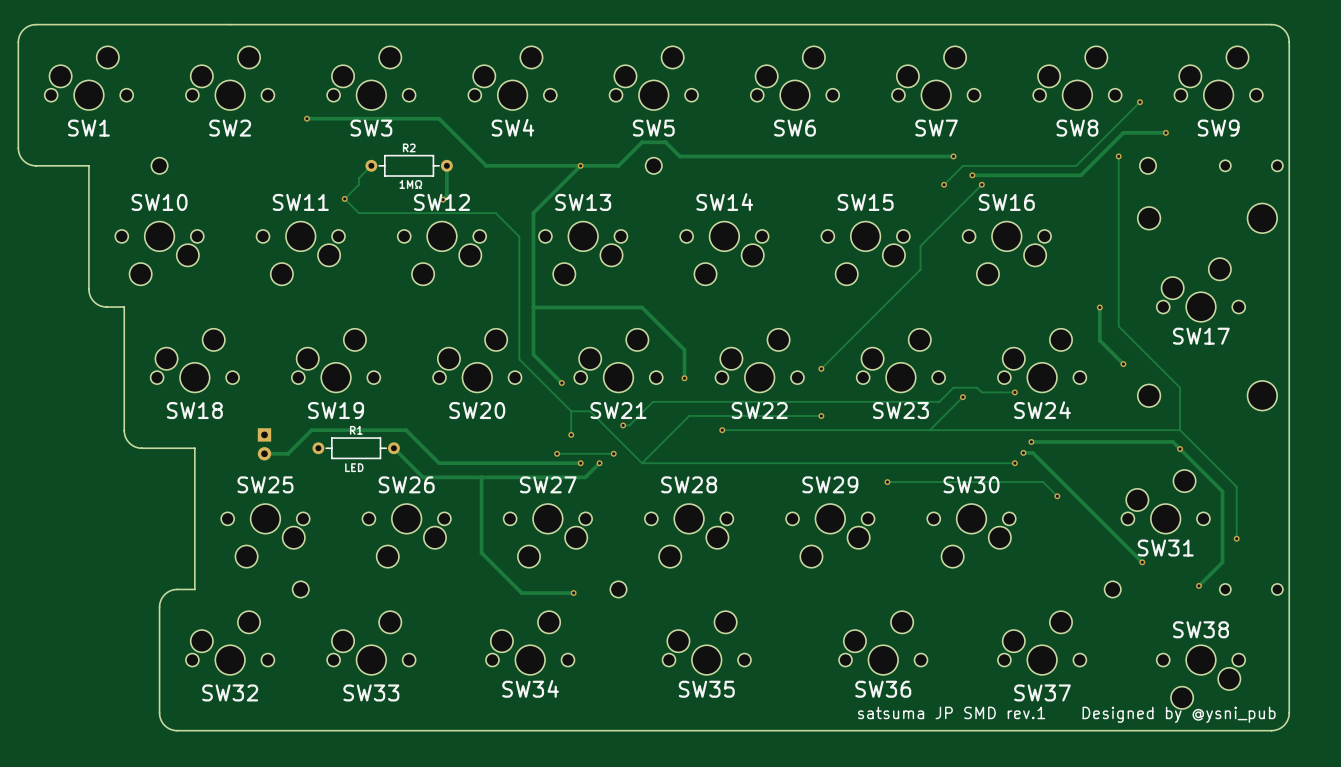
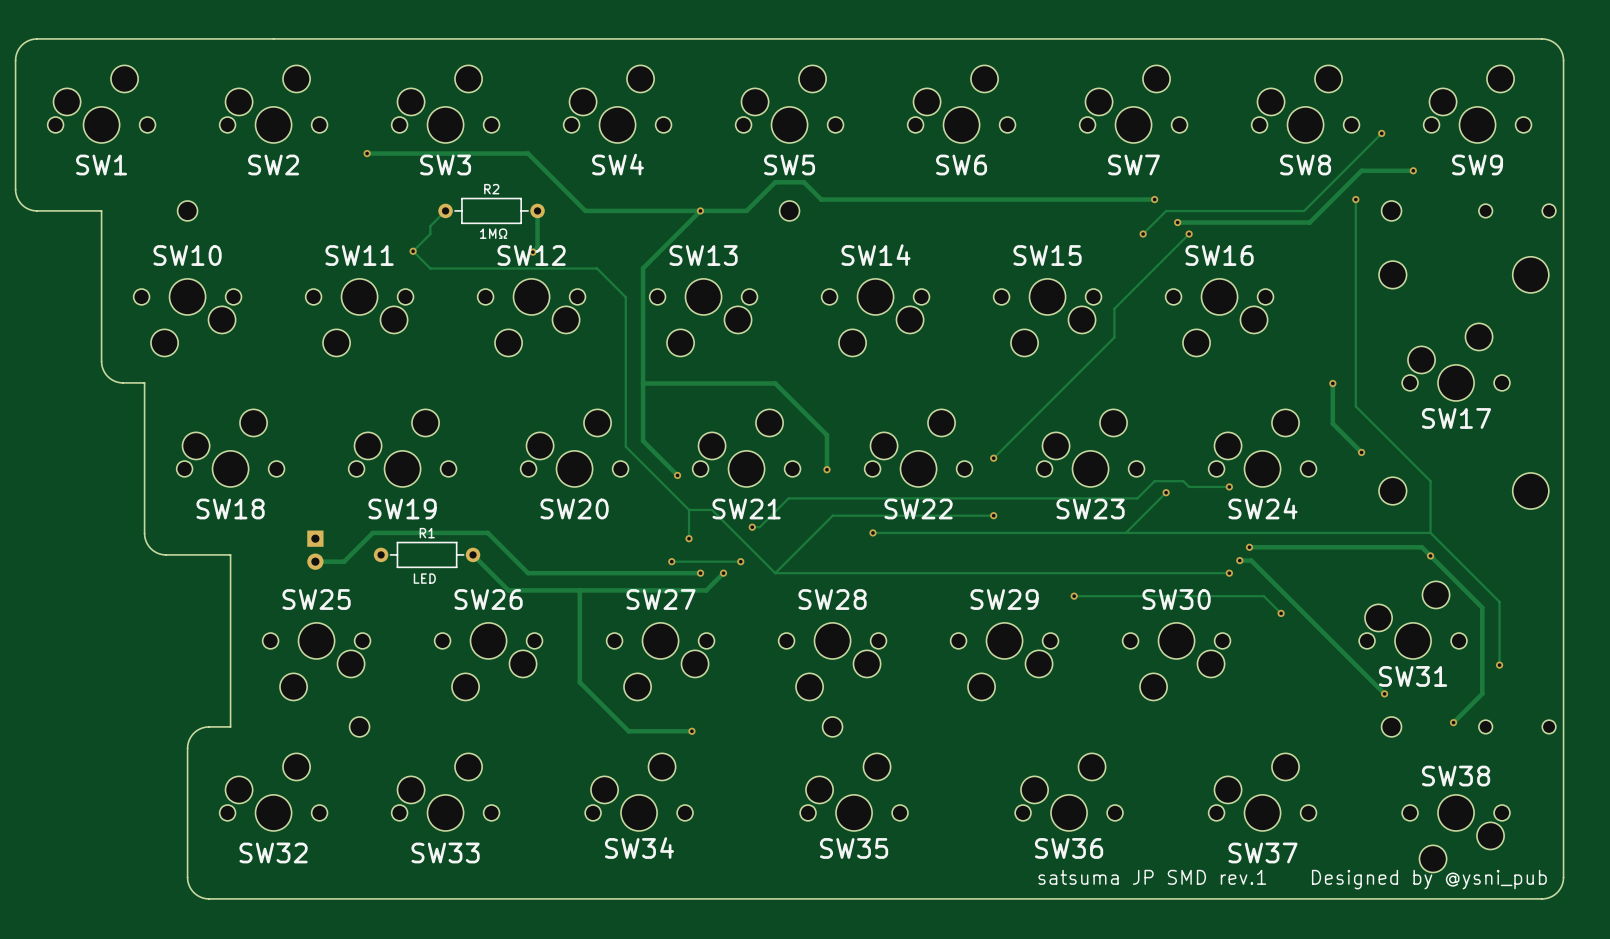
part position: (618, 589) -> (832, 726)
part position: (1112, 589) -> (1391, 726)

